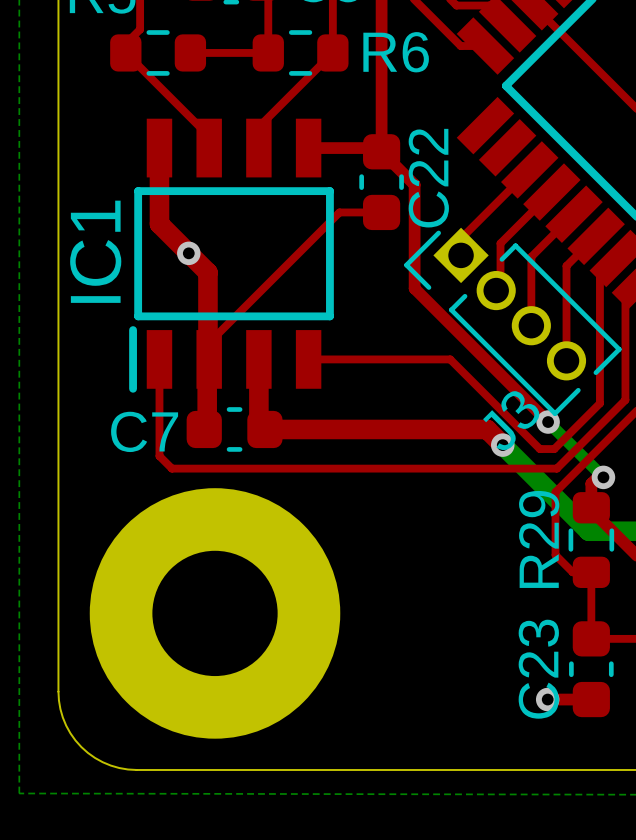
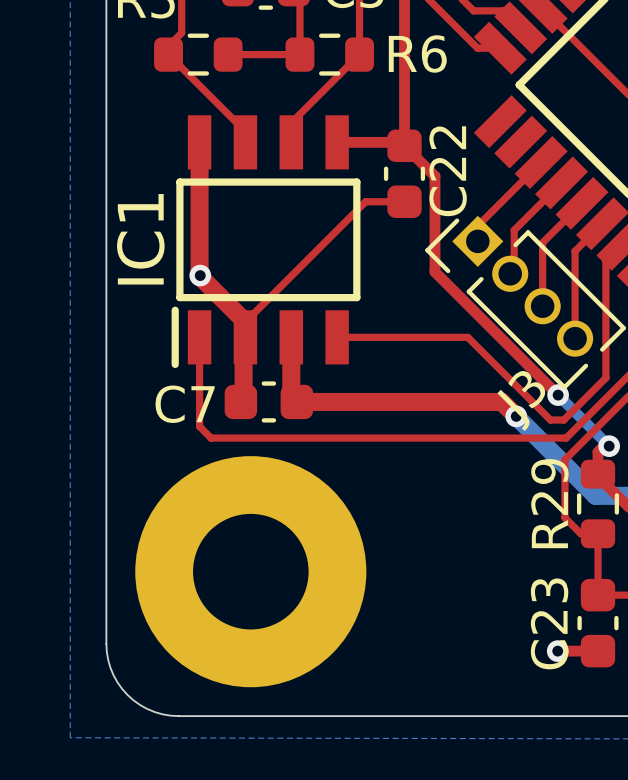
top track: (159, 224) (207, 272) (207, 341) -> (199, 212) (199, 276) (244, 320)
via position: (188, 253) -> (200, 275)

